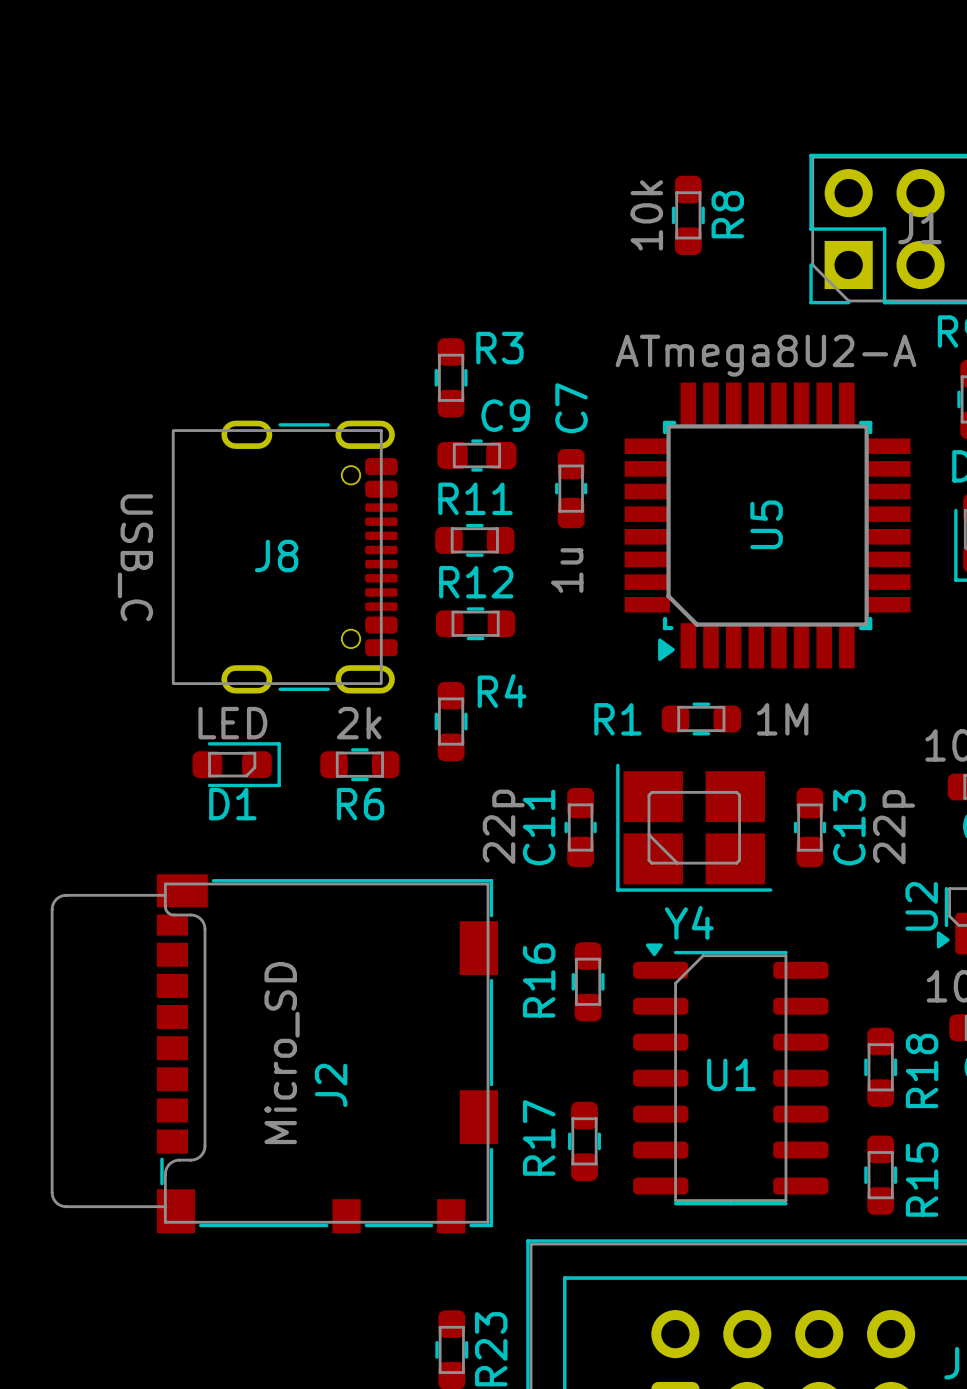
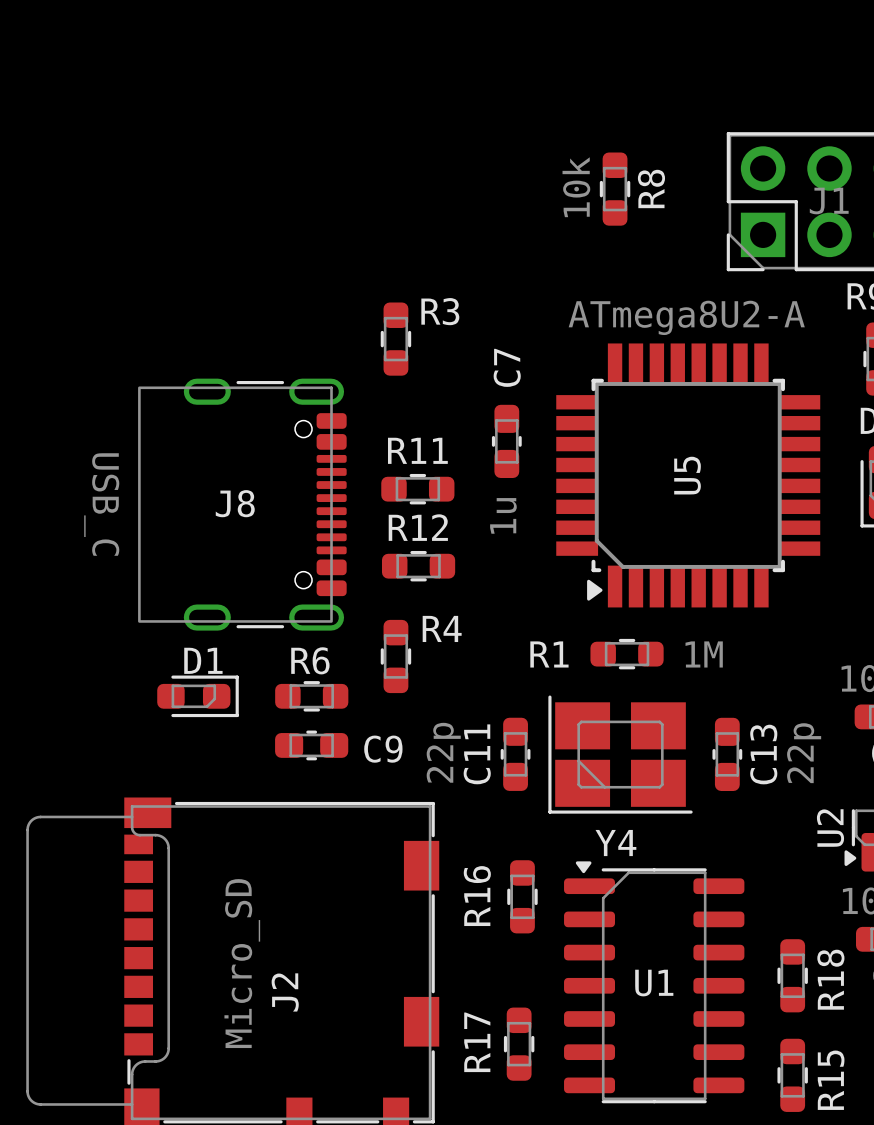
C9 name position: C9 (505, 415) -> C9 (383, 749)
C9 position: (476, 455) -> (311, 745)
D1 value: LED (232, 723) -> none
R6 value: 2k (359, 723) -> none
D1 name position: D1 (232, 804) -> D1 (203, 660)
R6 name position: R6 (360, 804) -> R6 (310, 660)

